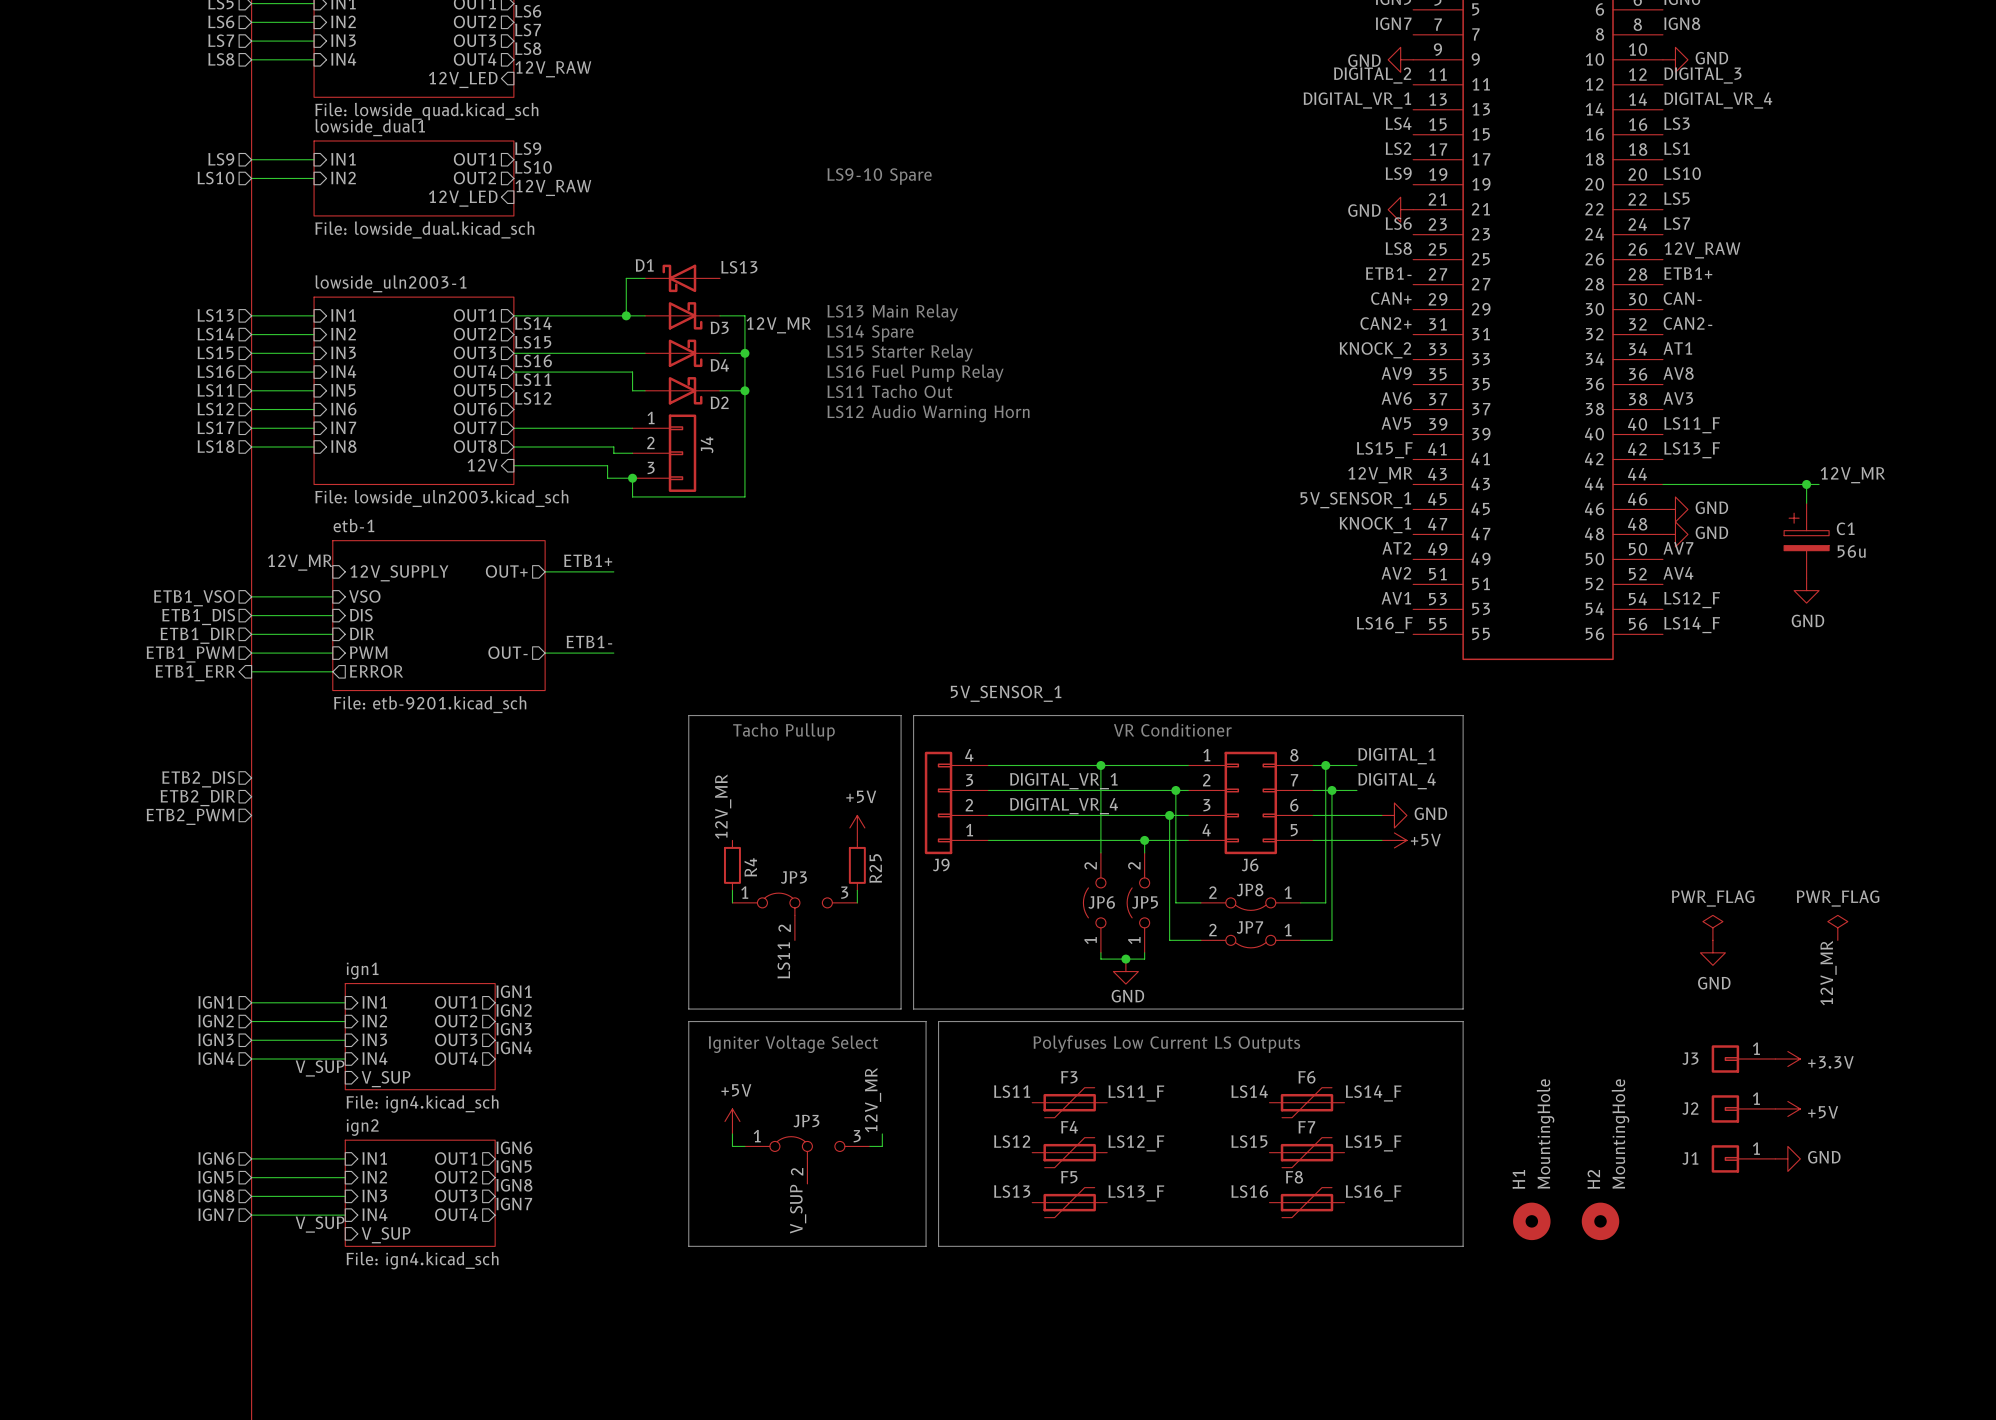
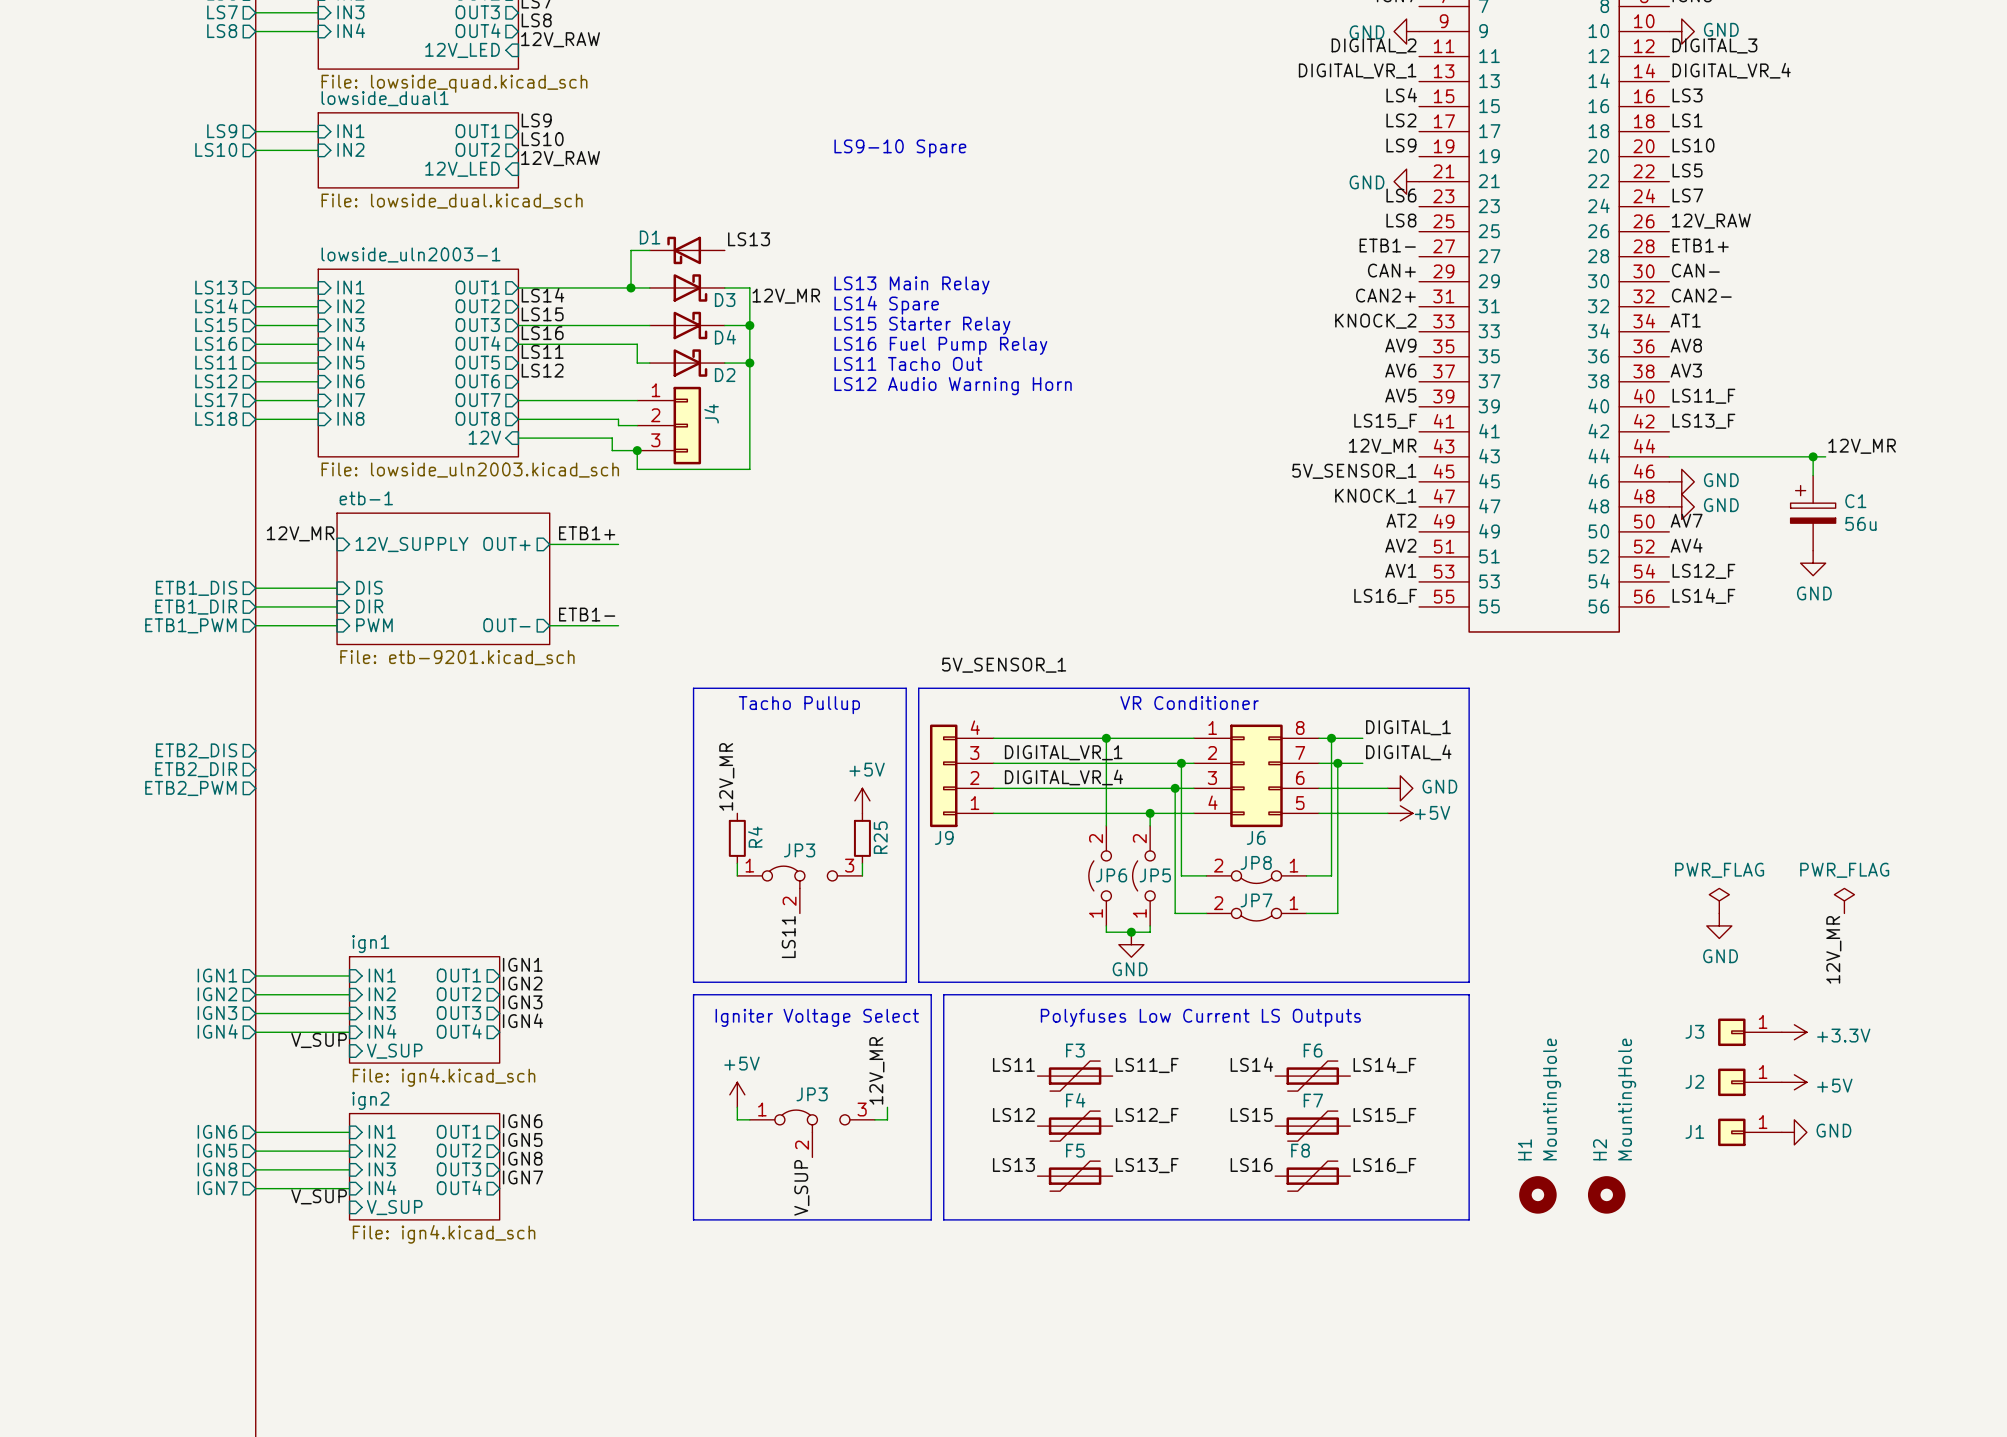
sheet etb-1 shape: [332, 540, 546, 691] -> [337, 513, 550, 645]
wire: (251, 596) (332, 596) -> none
sheet pin: VSO (364, 596) -> none
sheet pin: ETB1_VSO (194, 598) -> none
wire: (251, 671) (332, 671) -> none
sheet pin: ERROR (376, 671) -> none
sheet pin: ETB1_ERR (195, 673) -> none

